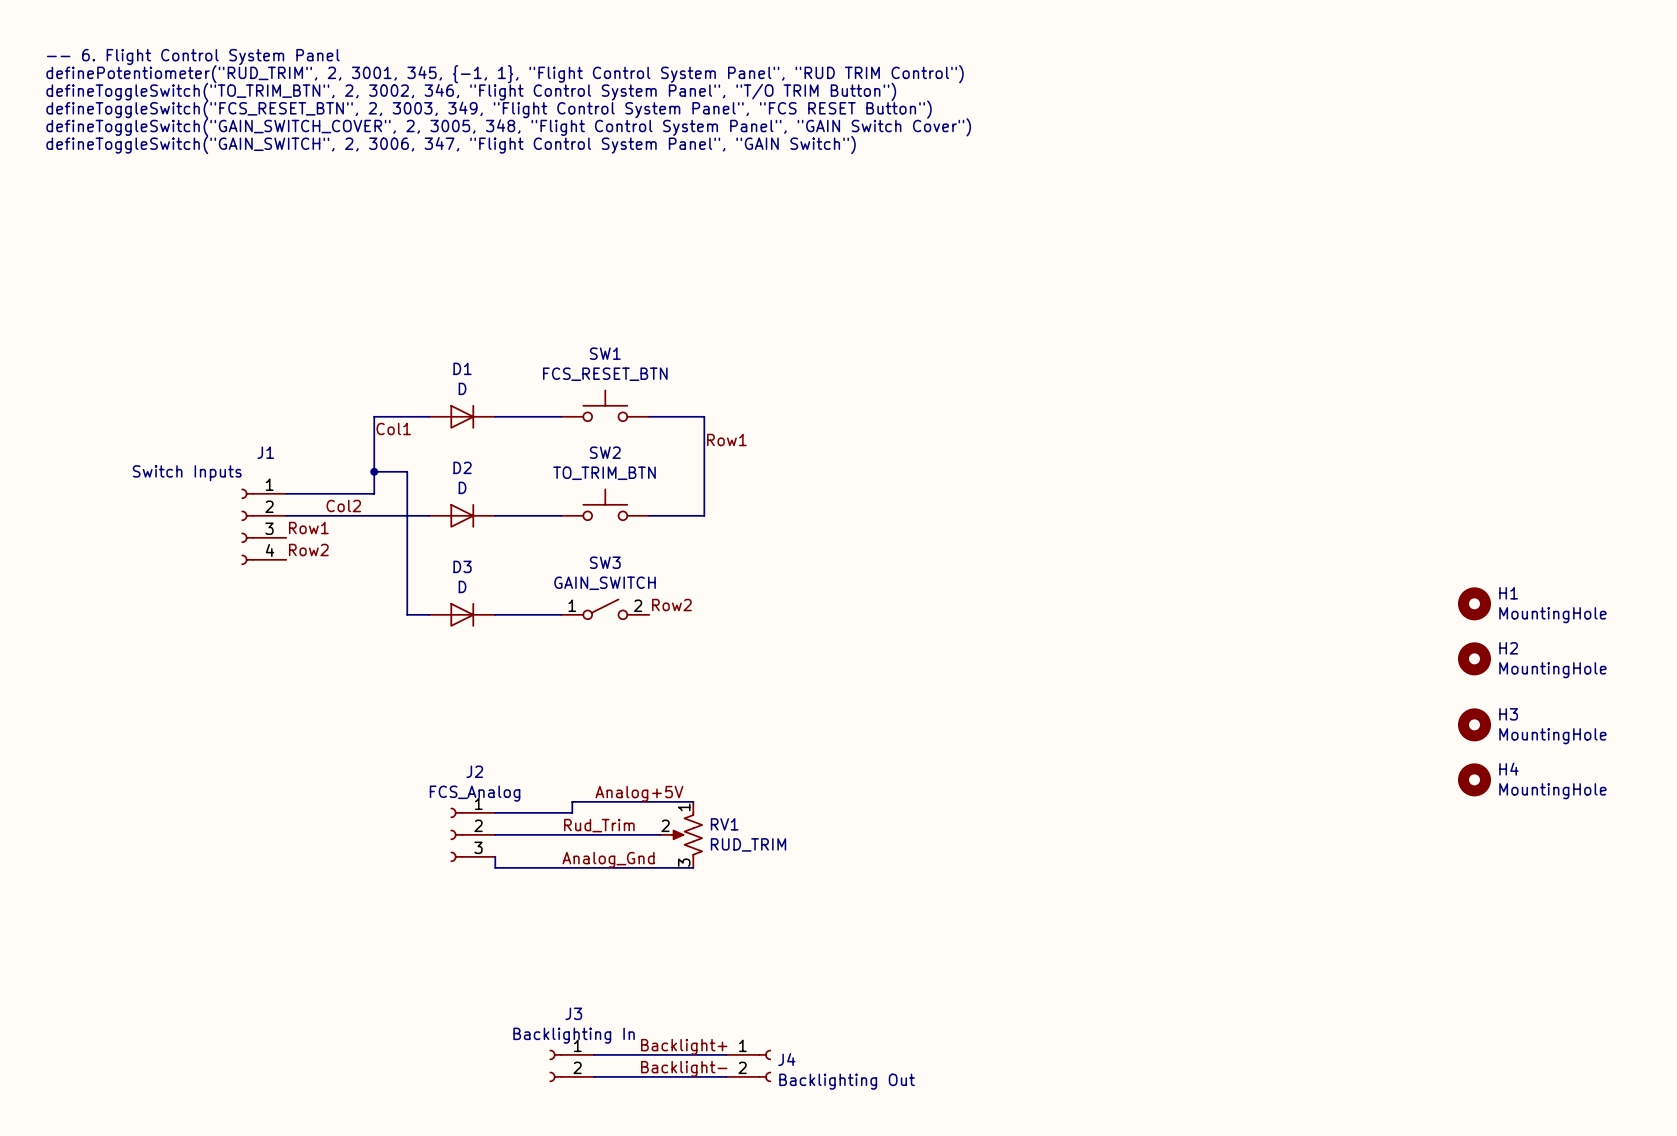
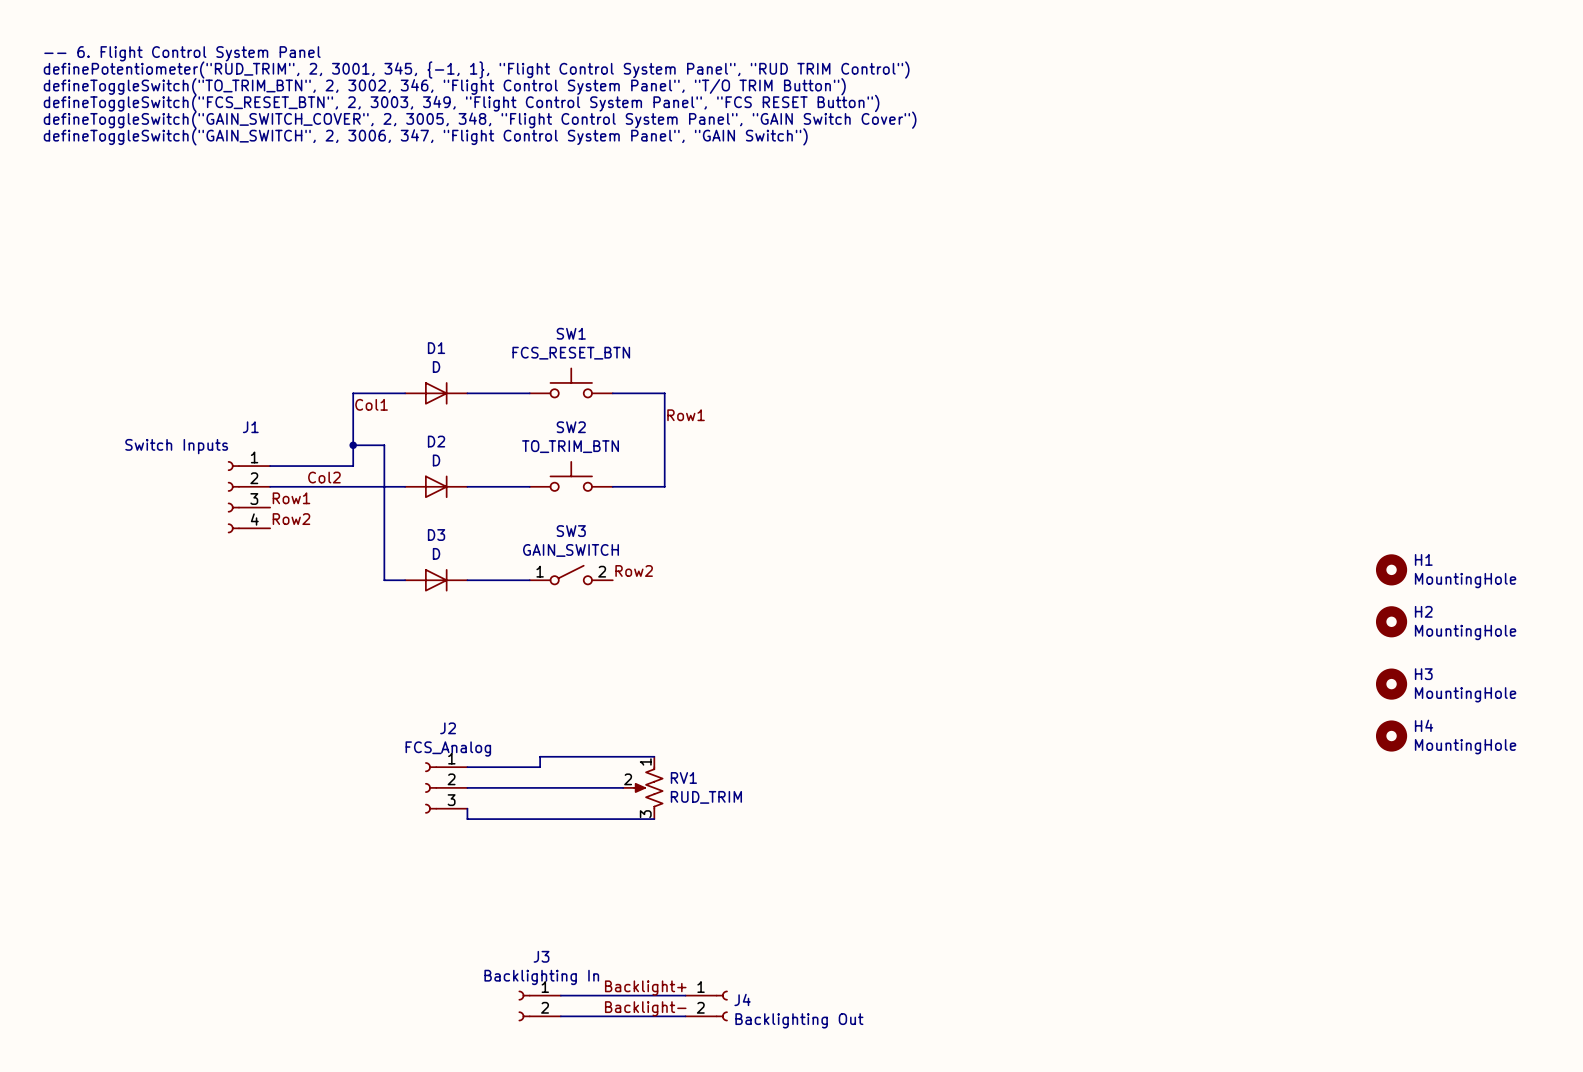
label: Analog+5V (639, 793) -> none
label: Rud_Trim (599, 825) -> none
label: Analog_Gnd (608, 859) -> none

